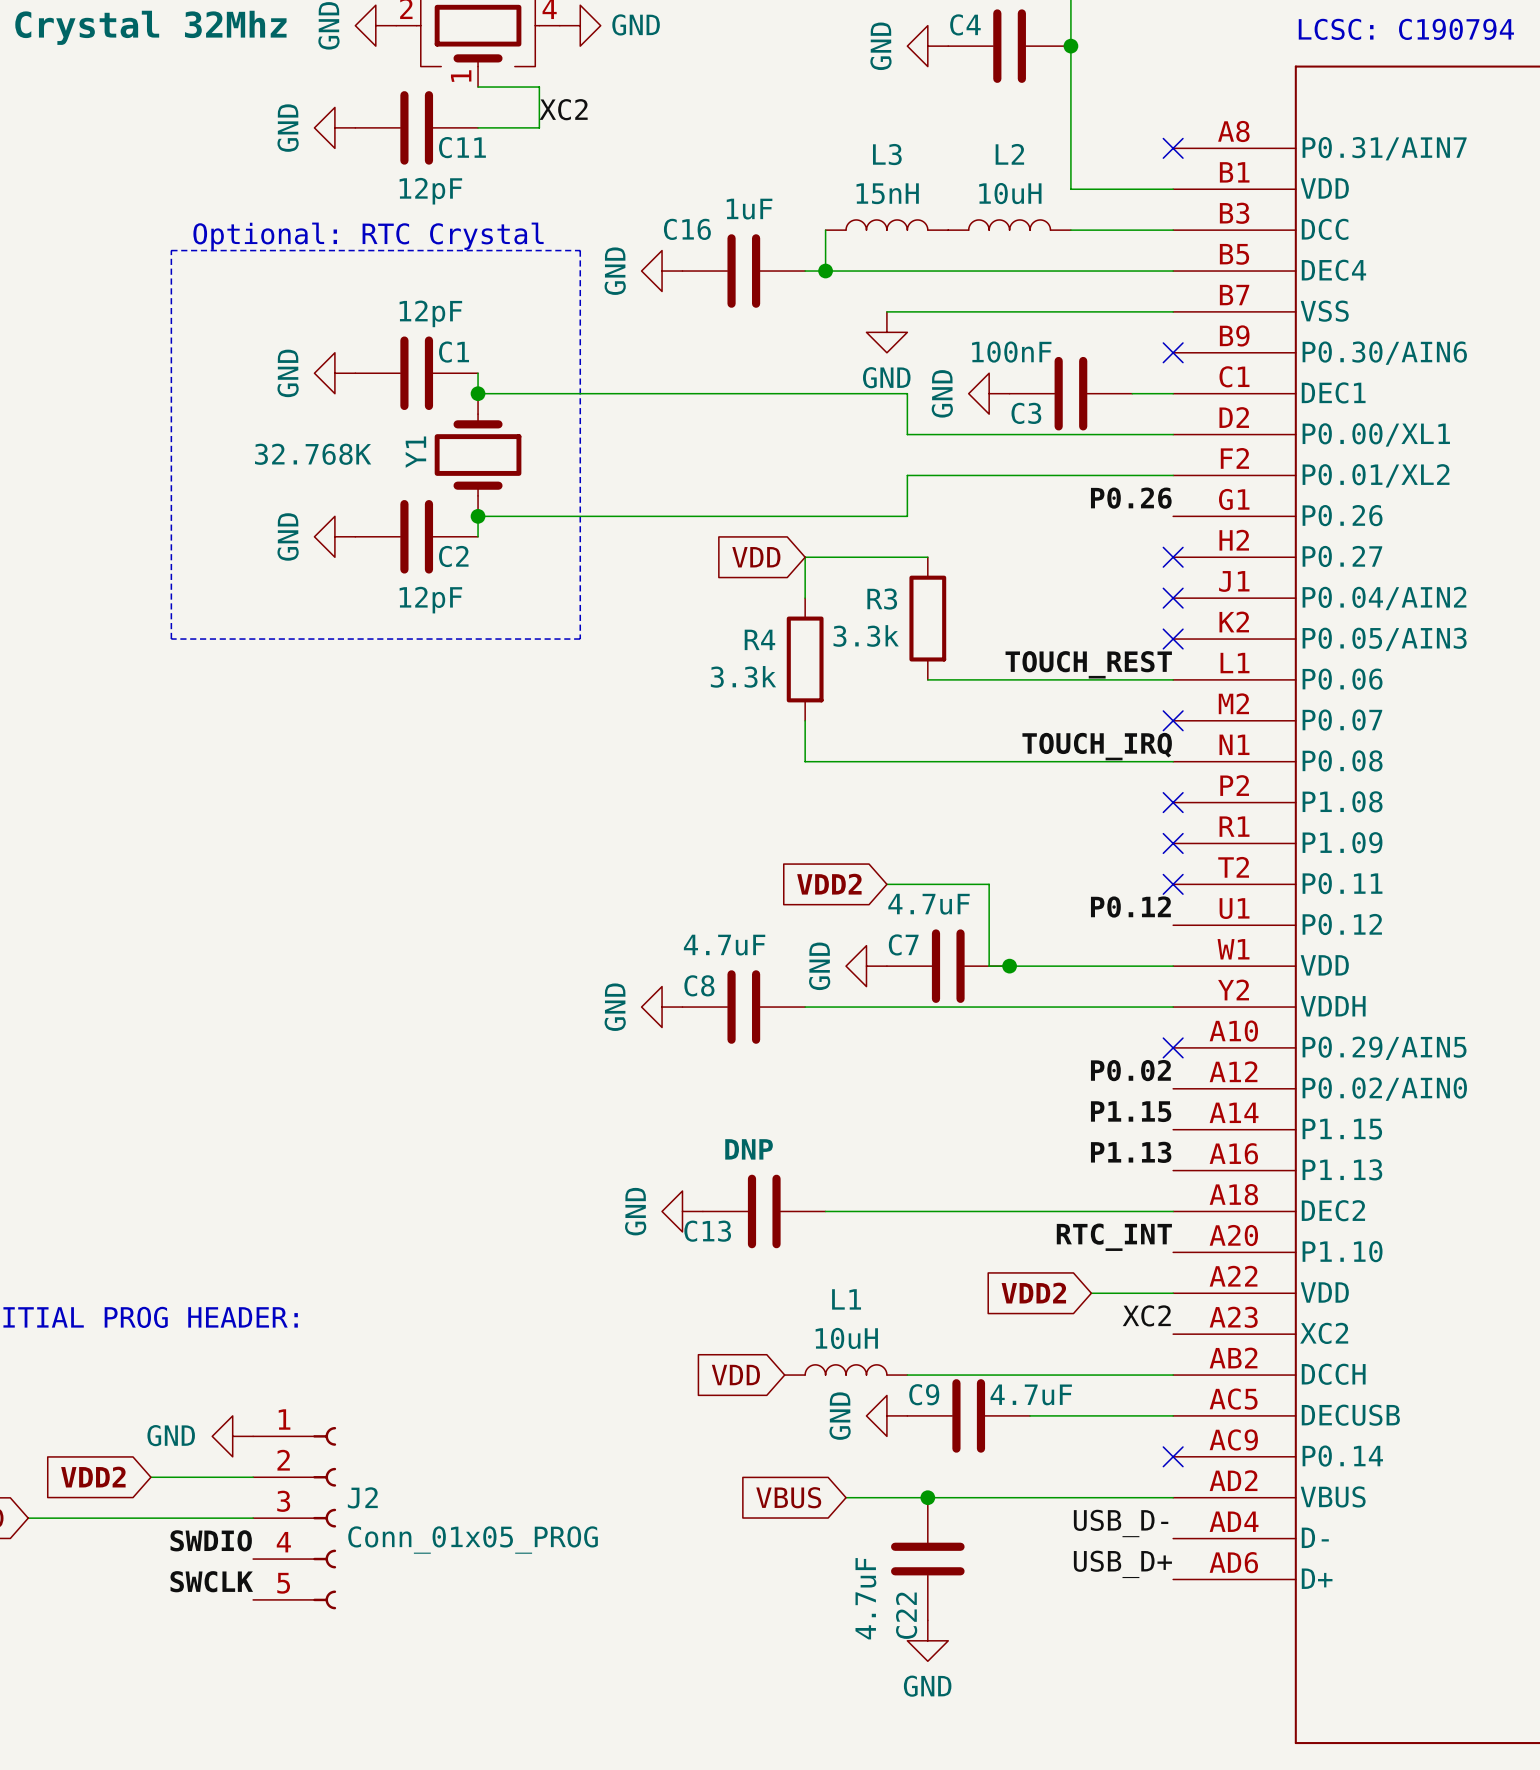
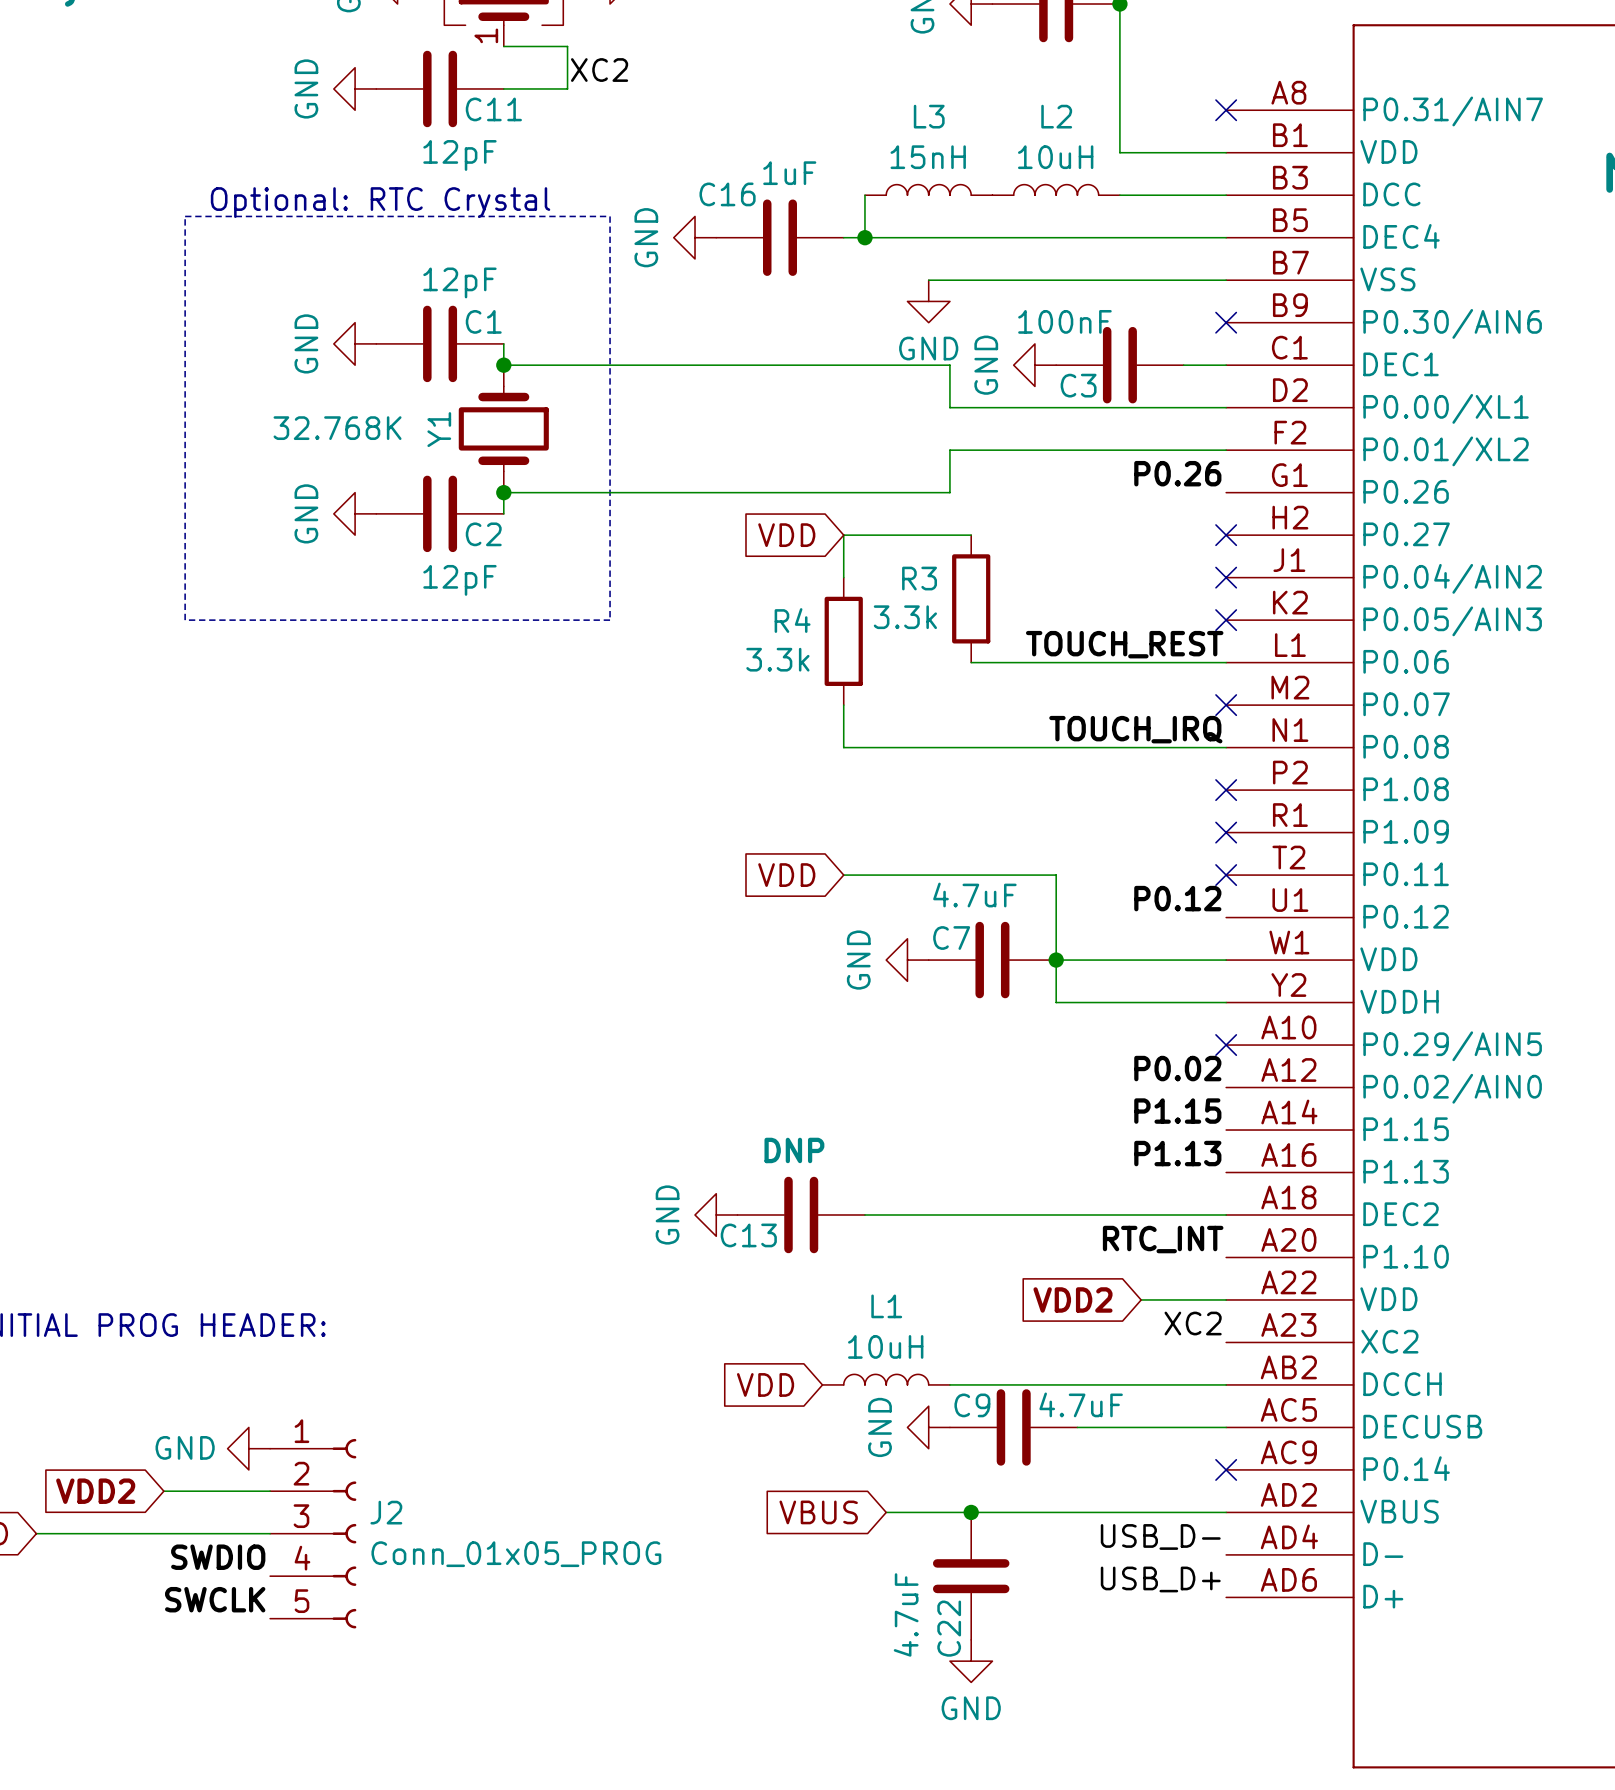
wire: none -> (843, 875) (928, 875)
global label: VDD2 (829, 884) -> VDD (786, 875)
wire: (989, 884) (989, 966) (1009, 966) -> (1034, 875) (1056, 875) (1056, 1002)
power symbol: GND (662, 1007) -> none
C8: 4.7uF (743, 1007) -> none
wire: (805, 1007) (1009, 1007) -> none

